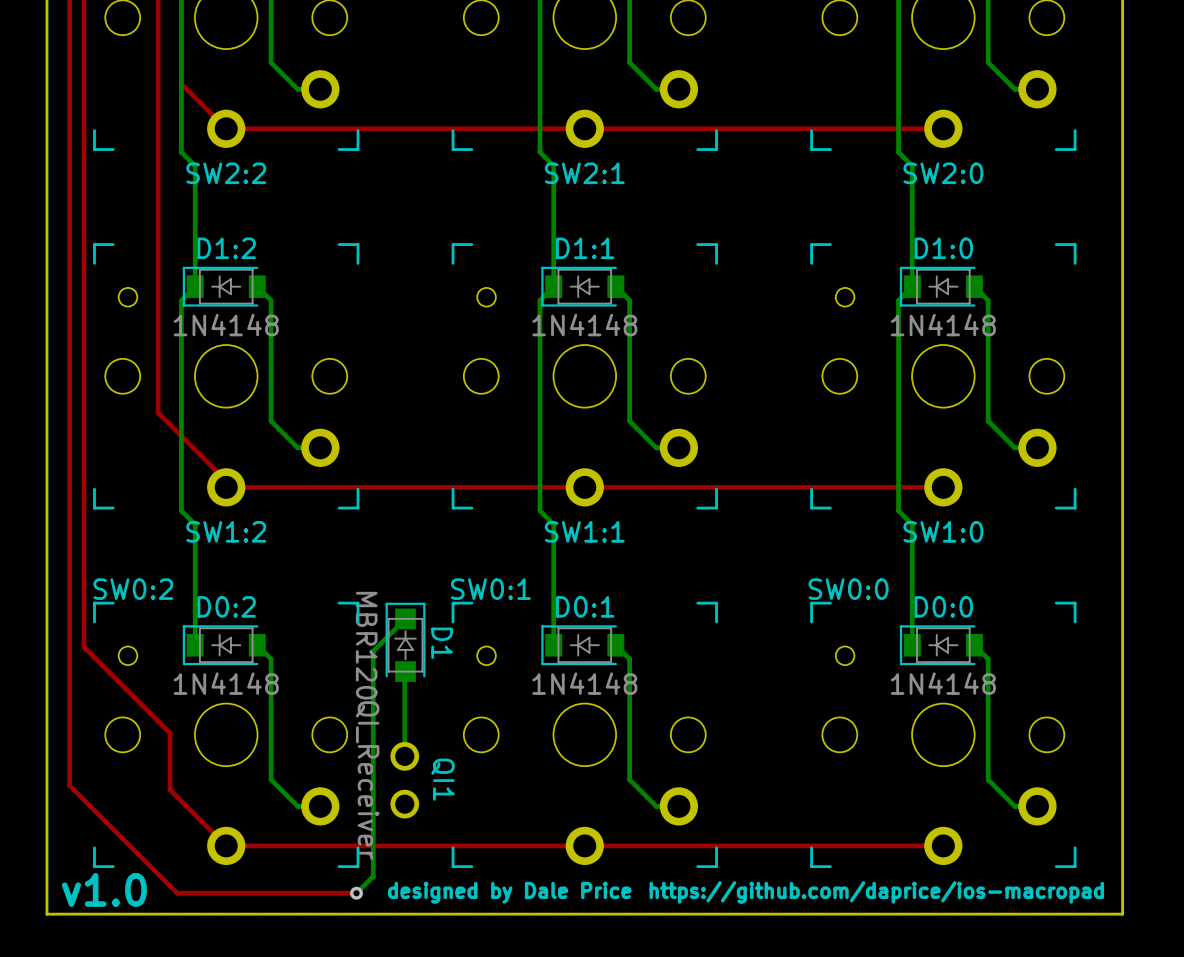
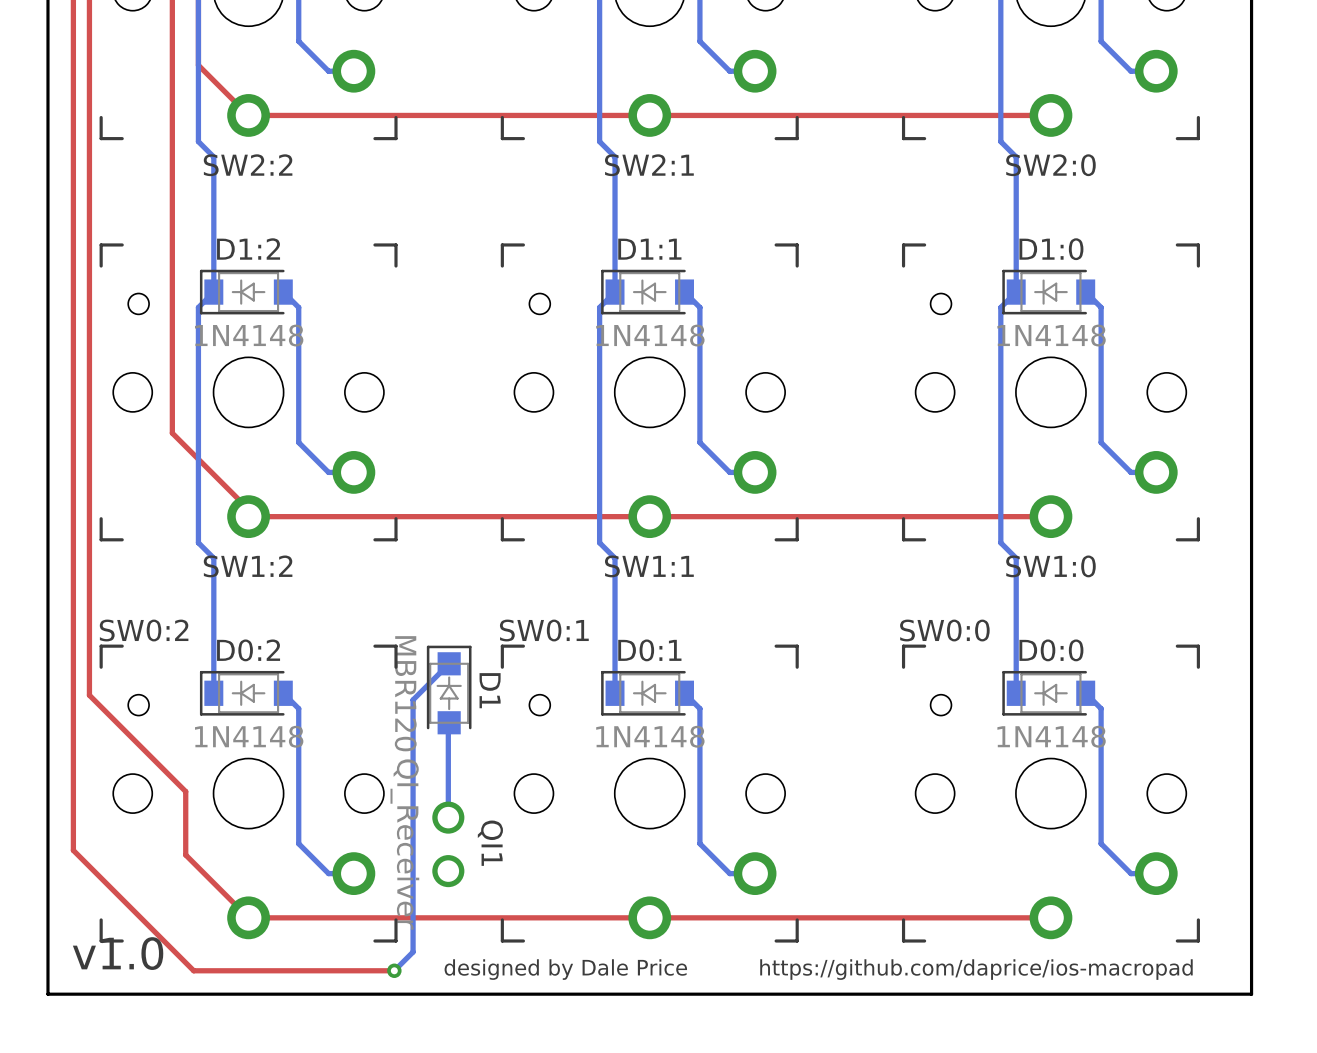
text position: v1.0 (104, 889) -> v1.0 (118, 953)

